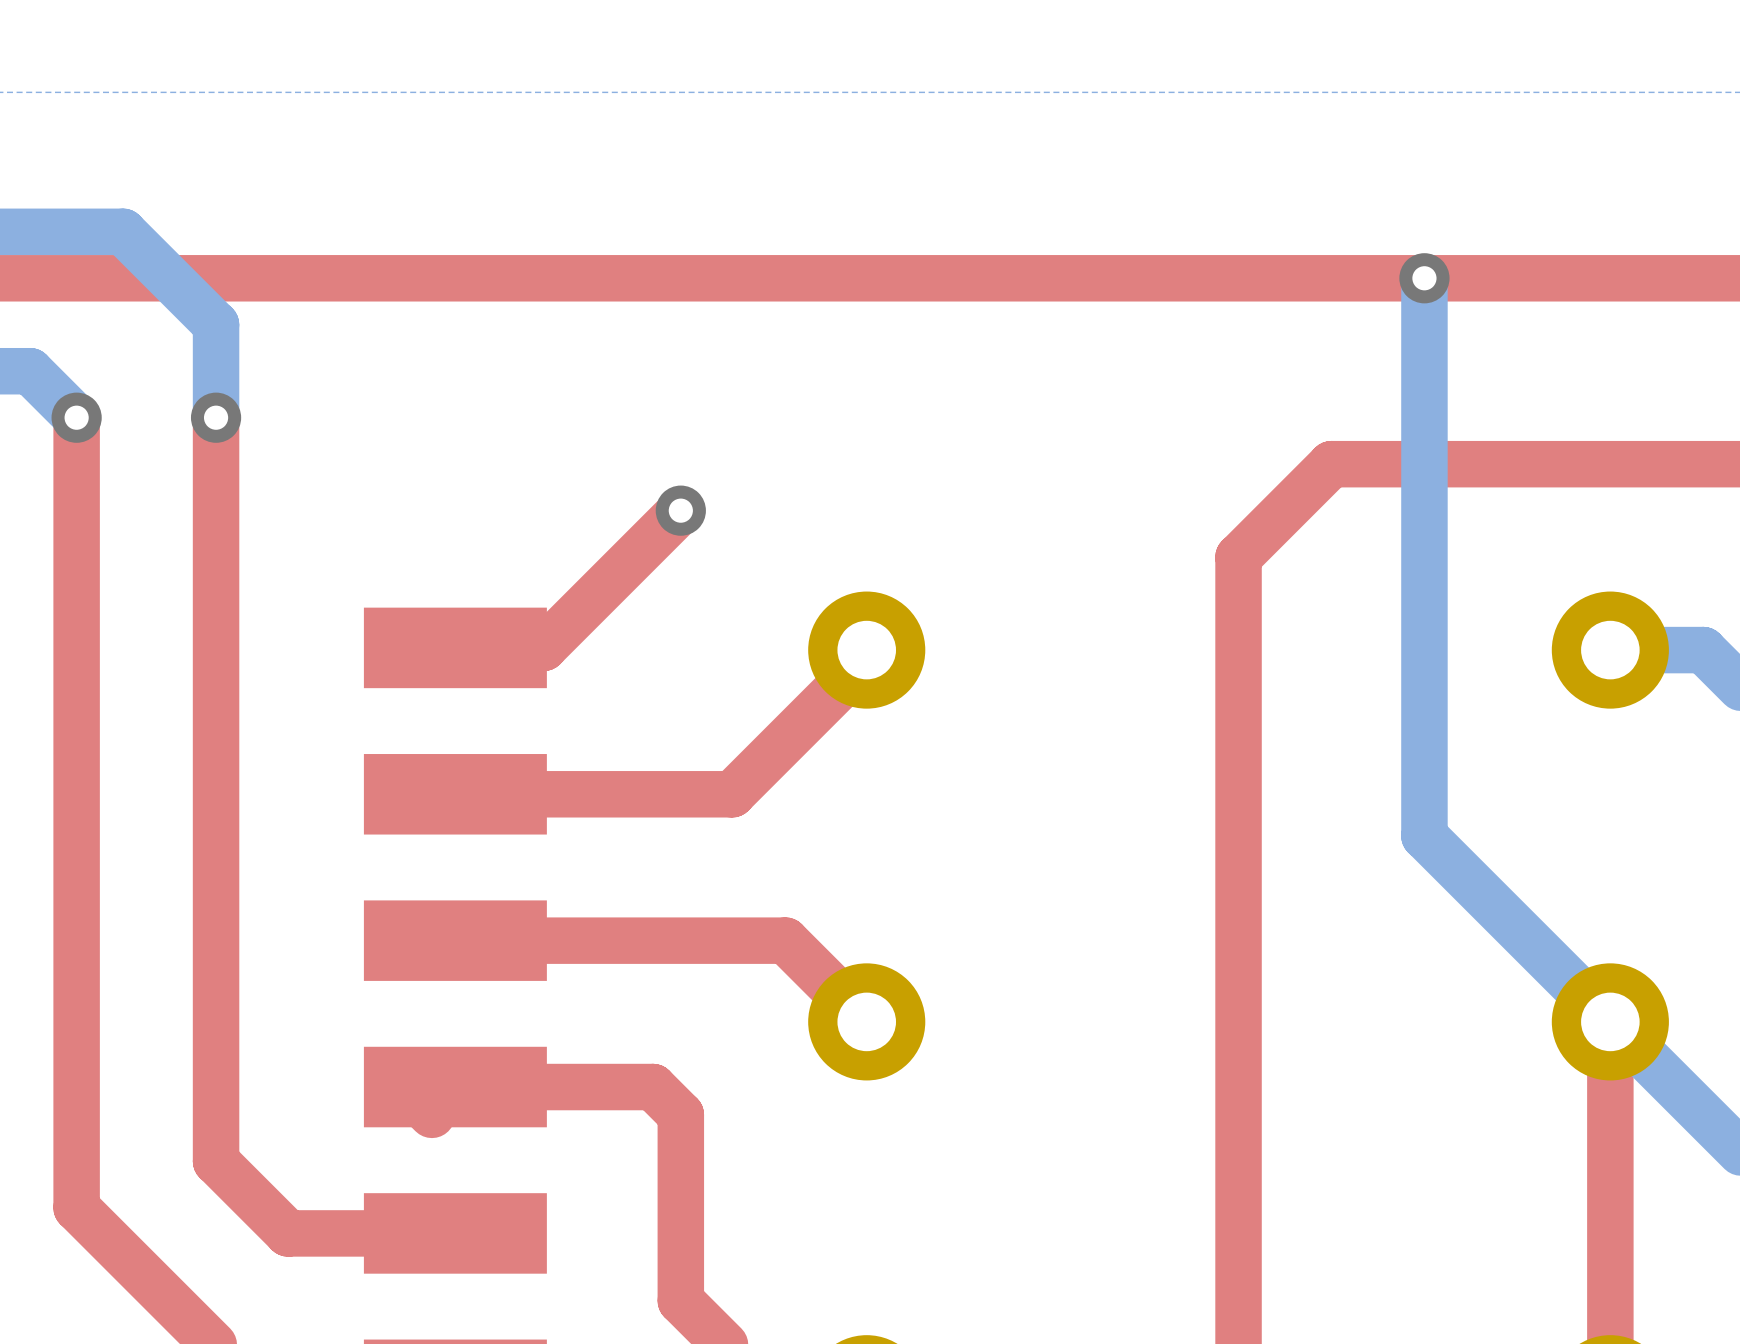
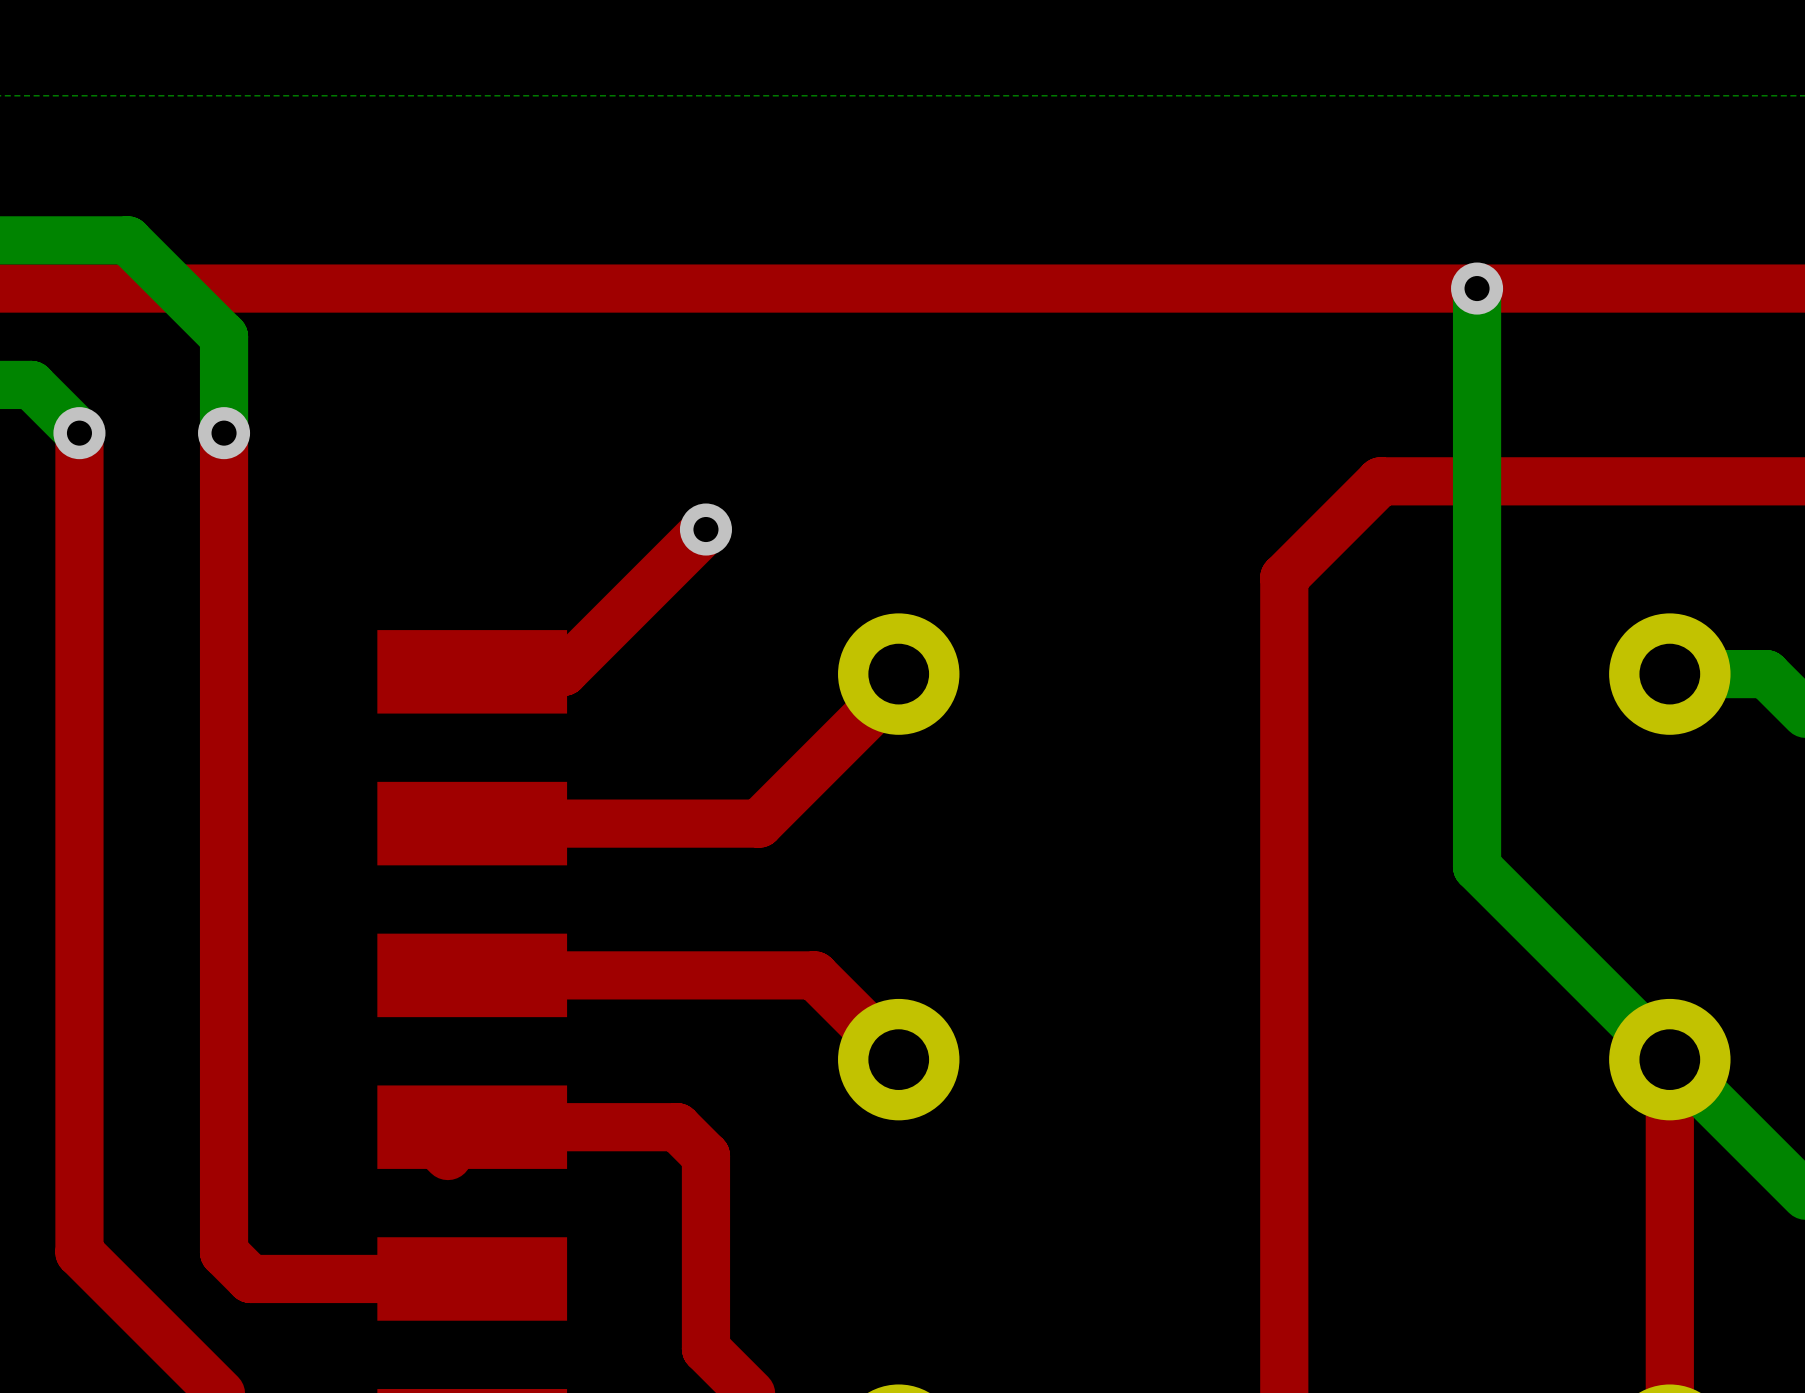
top track: (216, 1161) (288, 1233) -> (224, 1204) (224, 1252) (250, 1278) (298, 1278)

